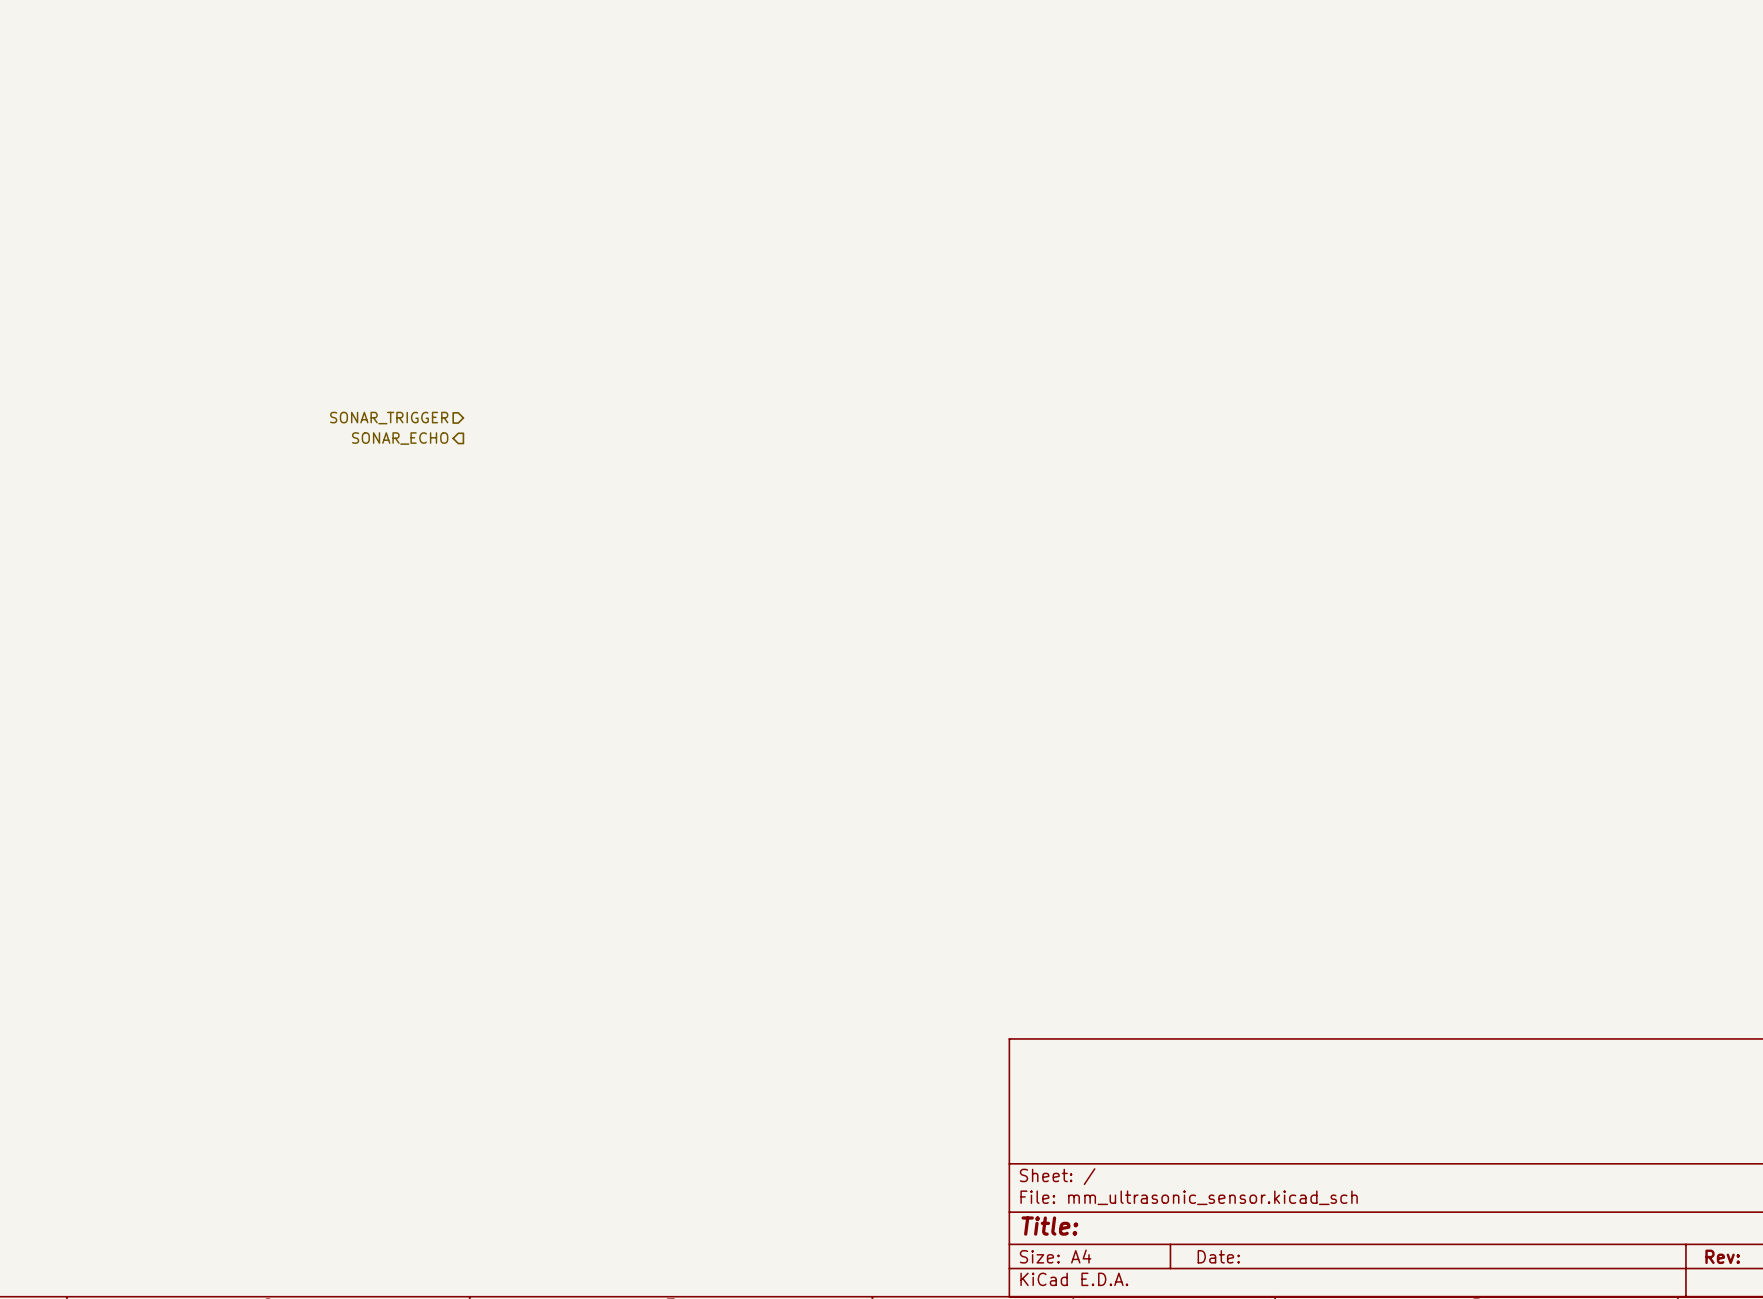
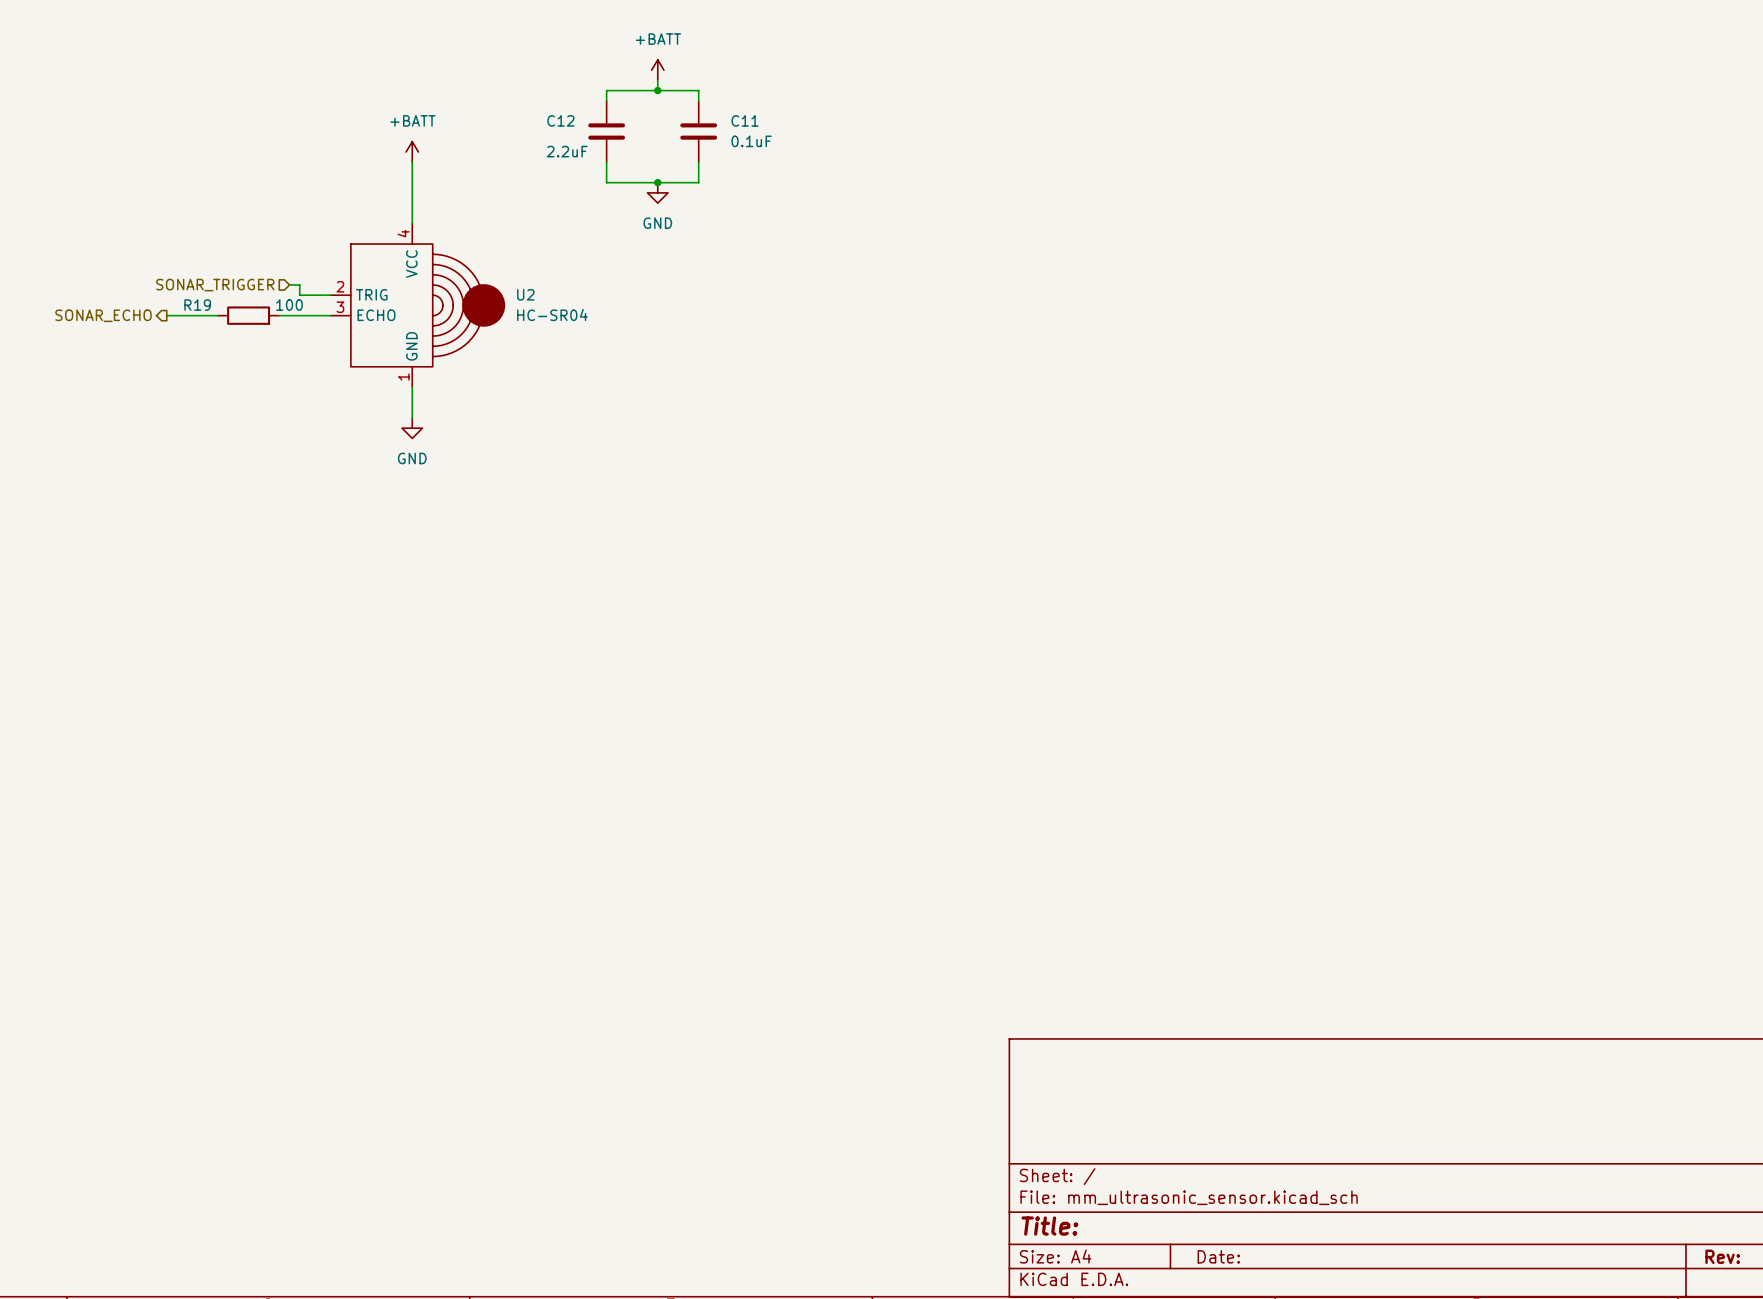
power symbol: none -> +BATT (657, 70)
wire: none -> (657, 80) (657, 90)
junction: none -> (657, 90)
wire: none -> (606, 100) (606, 90) (698, 90) (698, 100)
C12: none -> 2.2uF (606, 131)
C11: none -> 0.1uF (698, 131)
power symbol: none -> +BATT (412, 151)
wire: none -> (412, 162) (412, 223)
wire: none -> (606, 162) (606, 182) (698, 182) (698, 162)
junction: none -> (657, 182)
power symbol: none -> GND (657, 192)
wire: none -> (289, 284) (299, 284) (299, 295) (330, 295)
hierarchical label: none -> SONAR_TRIGGER (215, 285)
U2: none -> HC-SR04 (417, 305)
hierarchical label: none -> SONAR_ECHO (103, 315)
wire: none -> (166, 315) (217, 315)
R19: none -> 100 (248, 315)
wire: none -> (279, 315) (330, 315)
wire: none -> (412, 387) (412, 417)
hierarchical label: SONAR_TRIGGER (389, 418) -> none
power symbol: none -> GND (412, 428)
hierarchical label: SONAR_ECHO (400, 438) -> none

